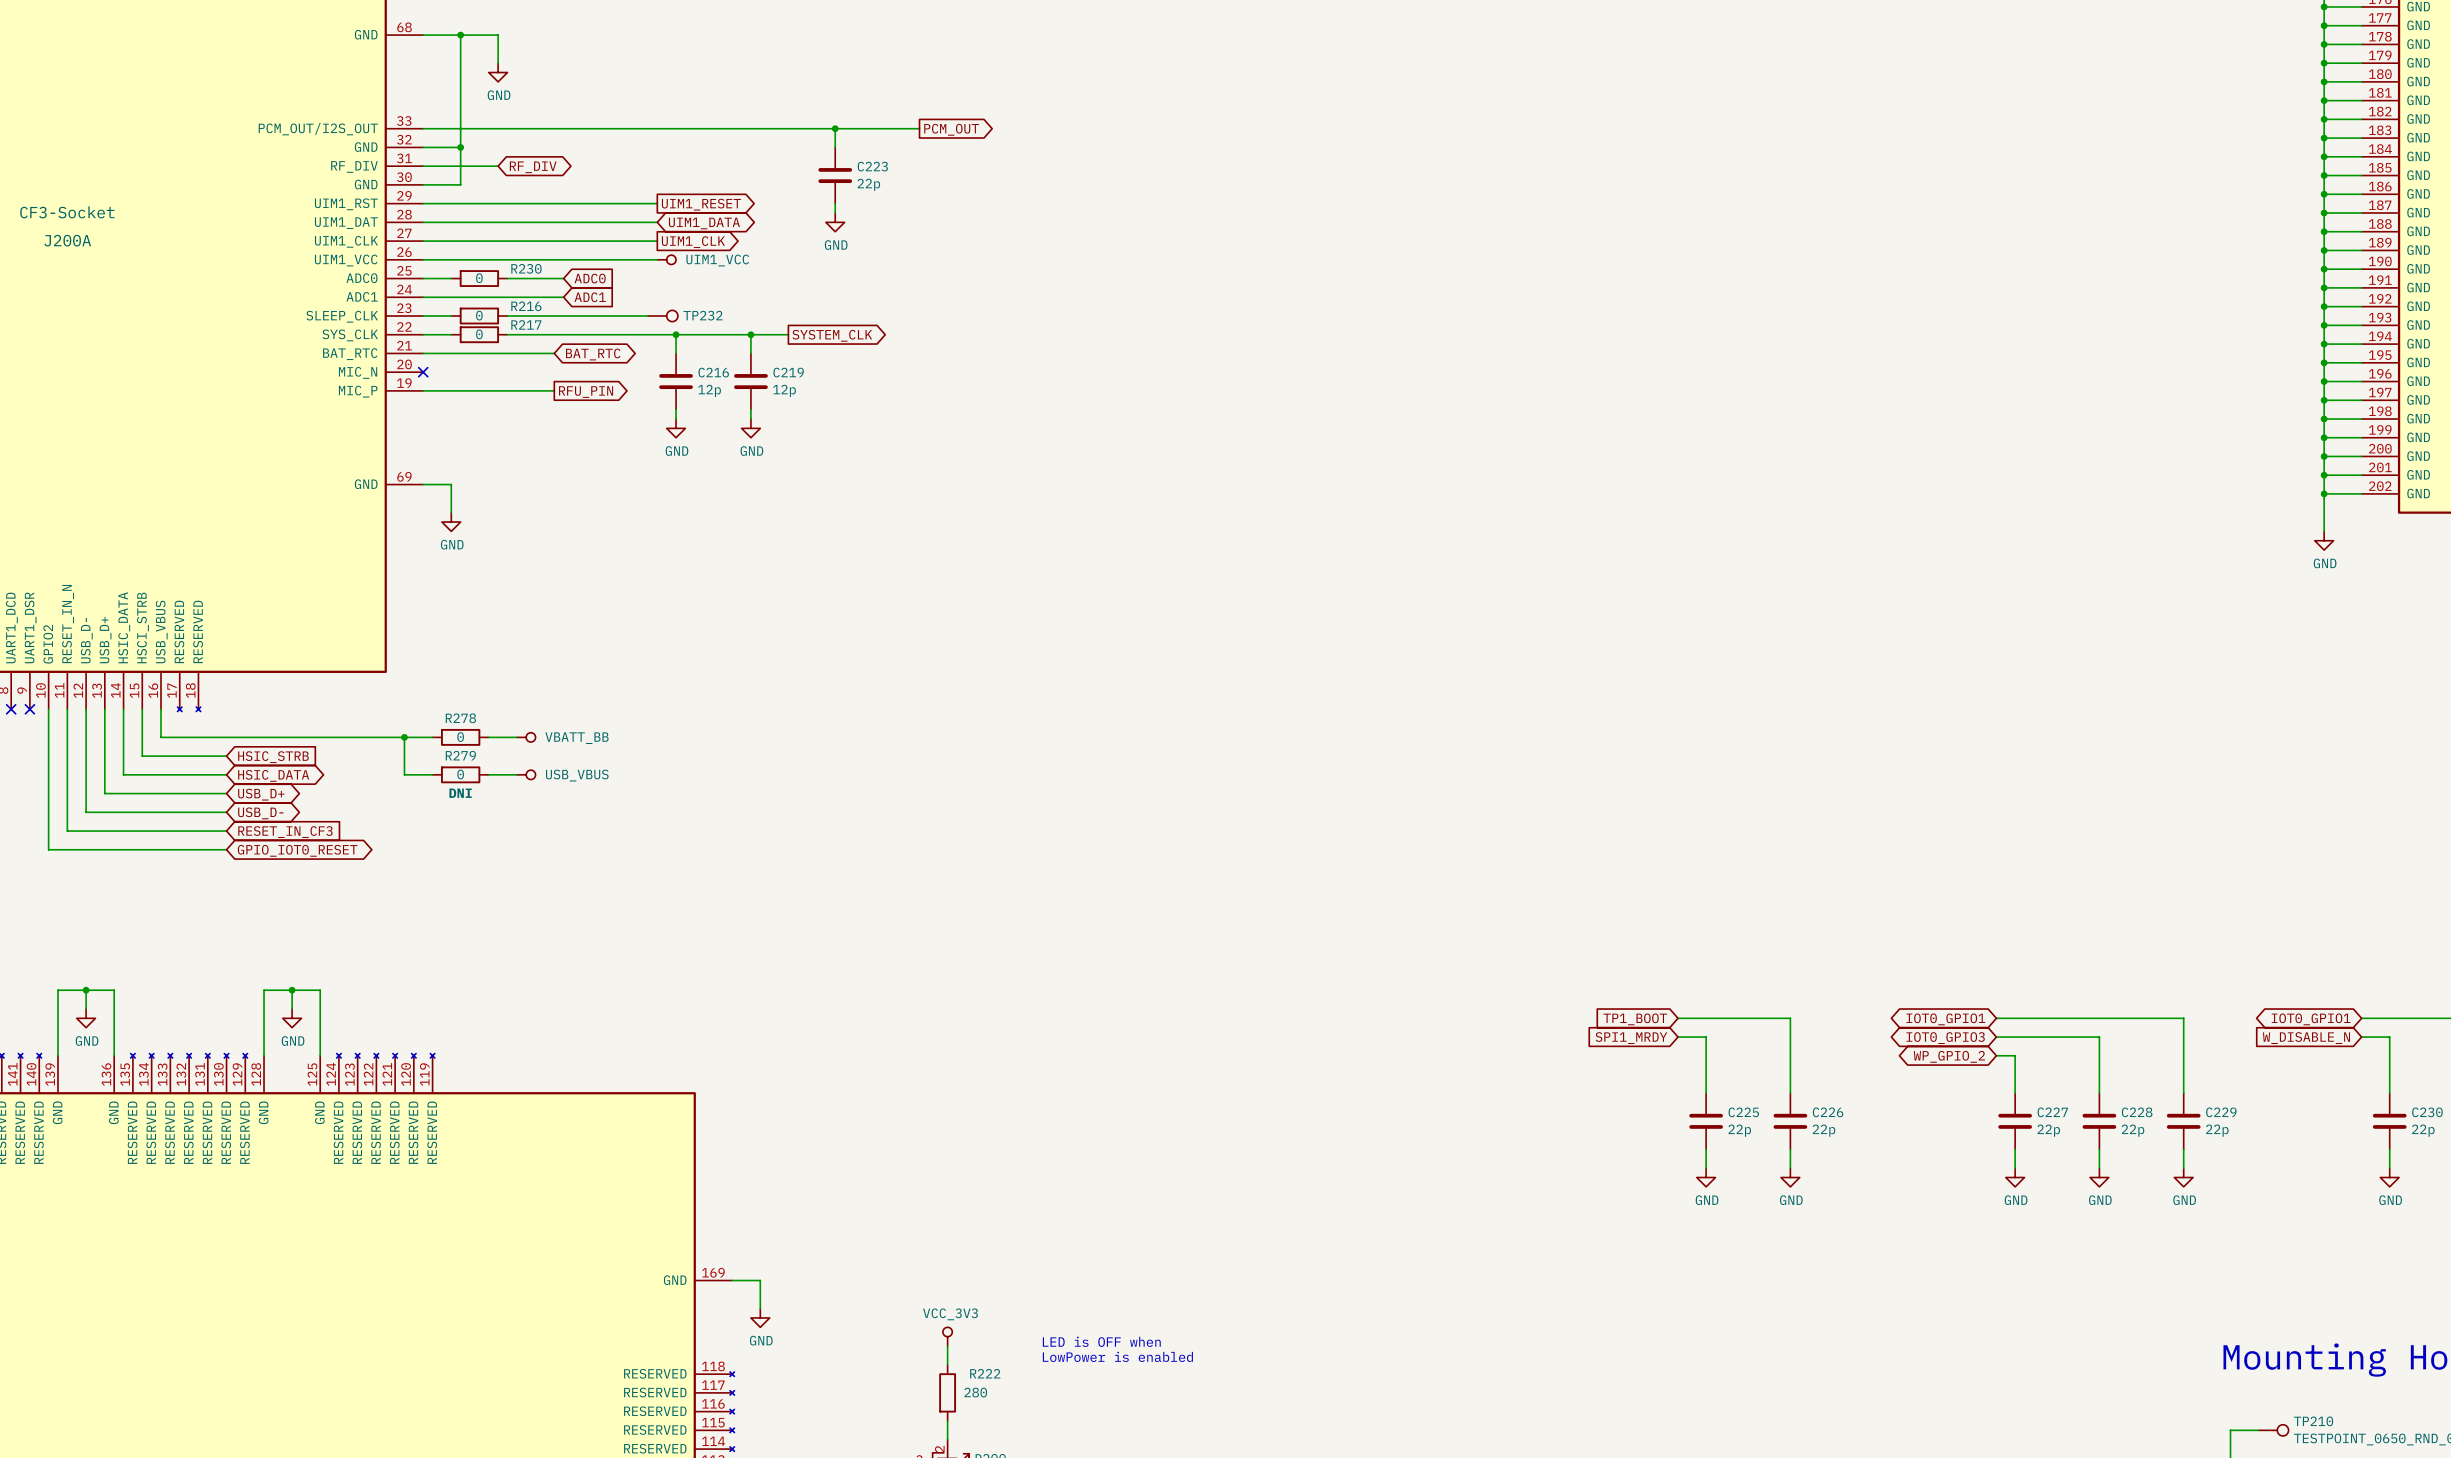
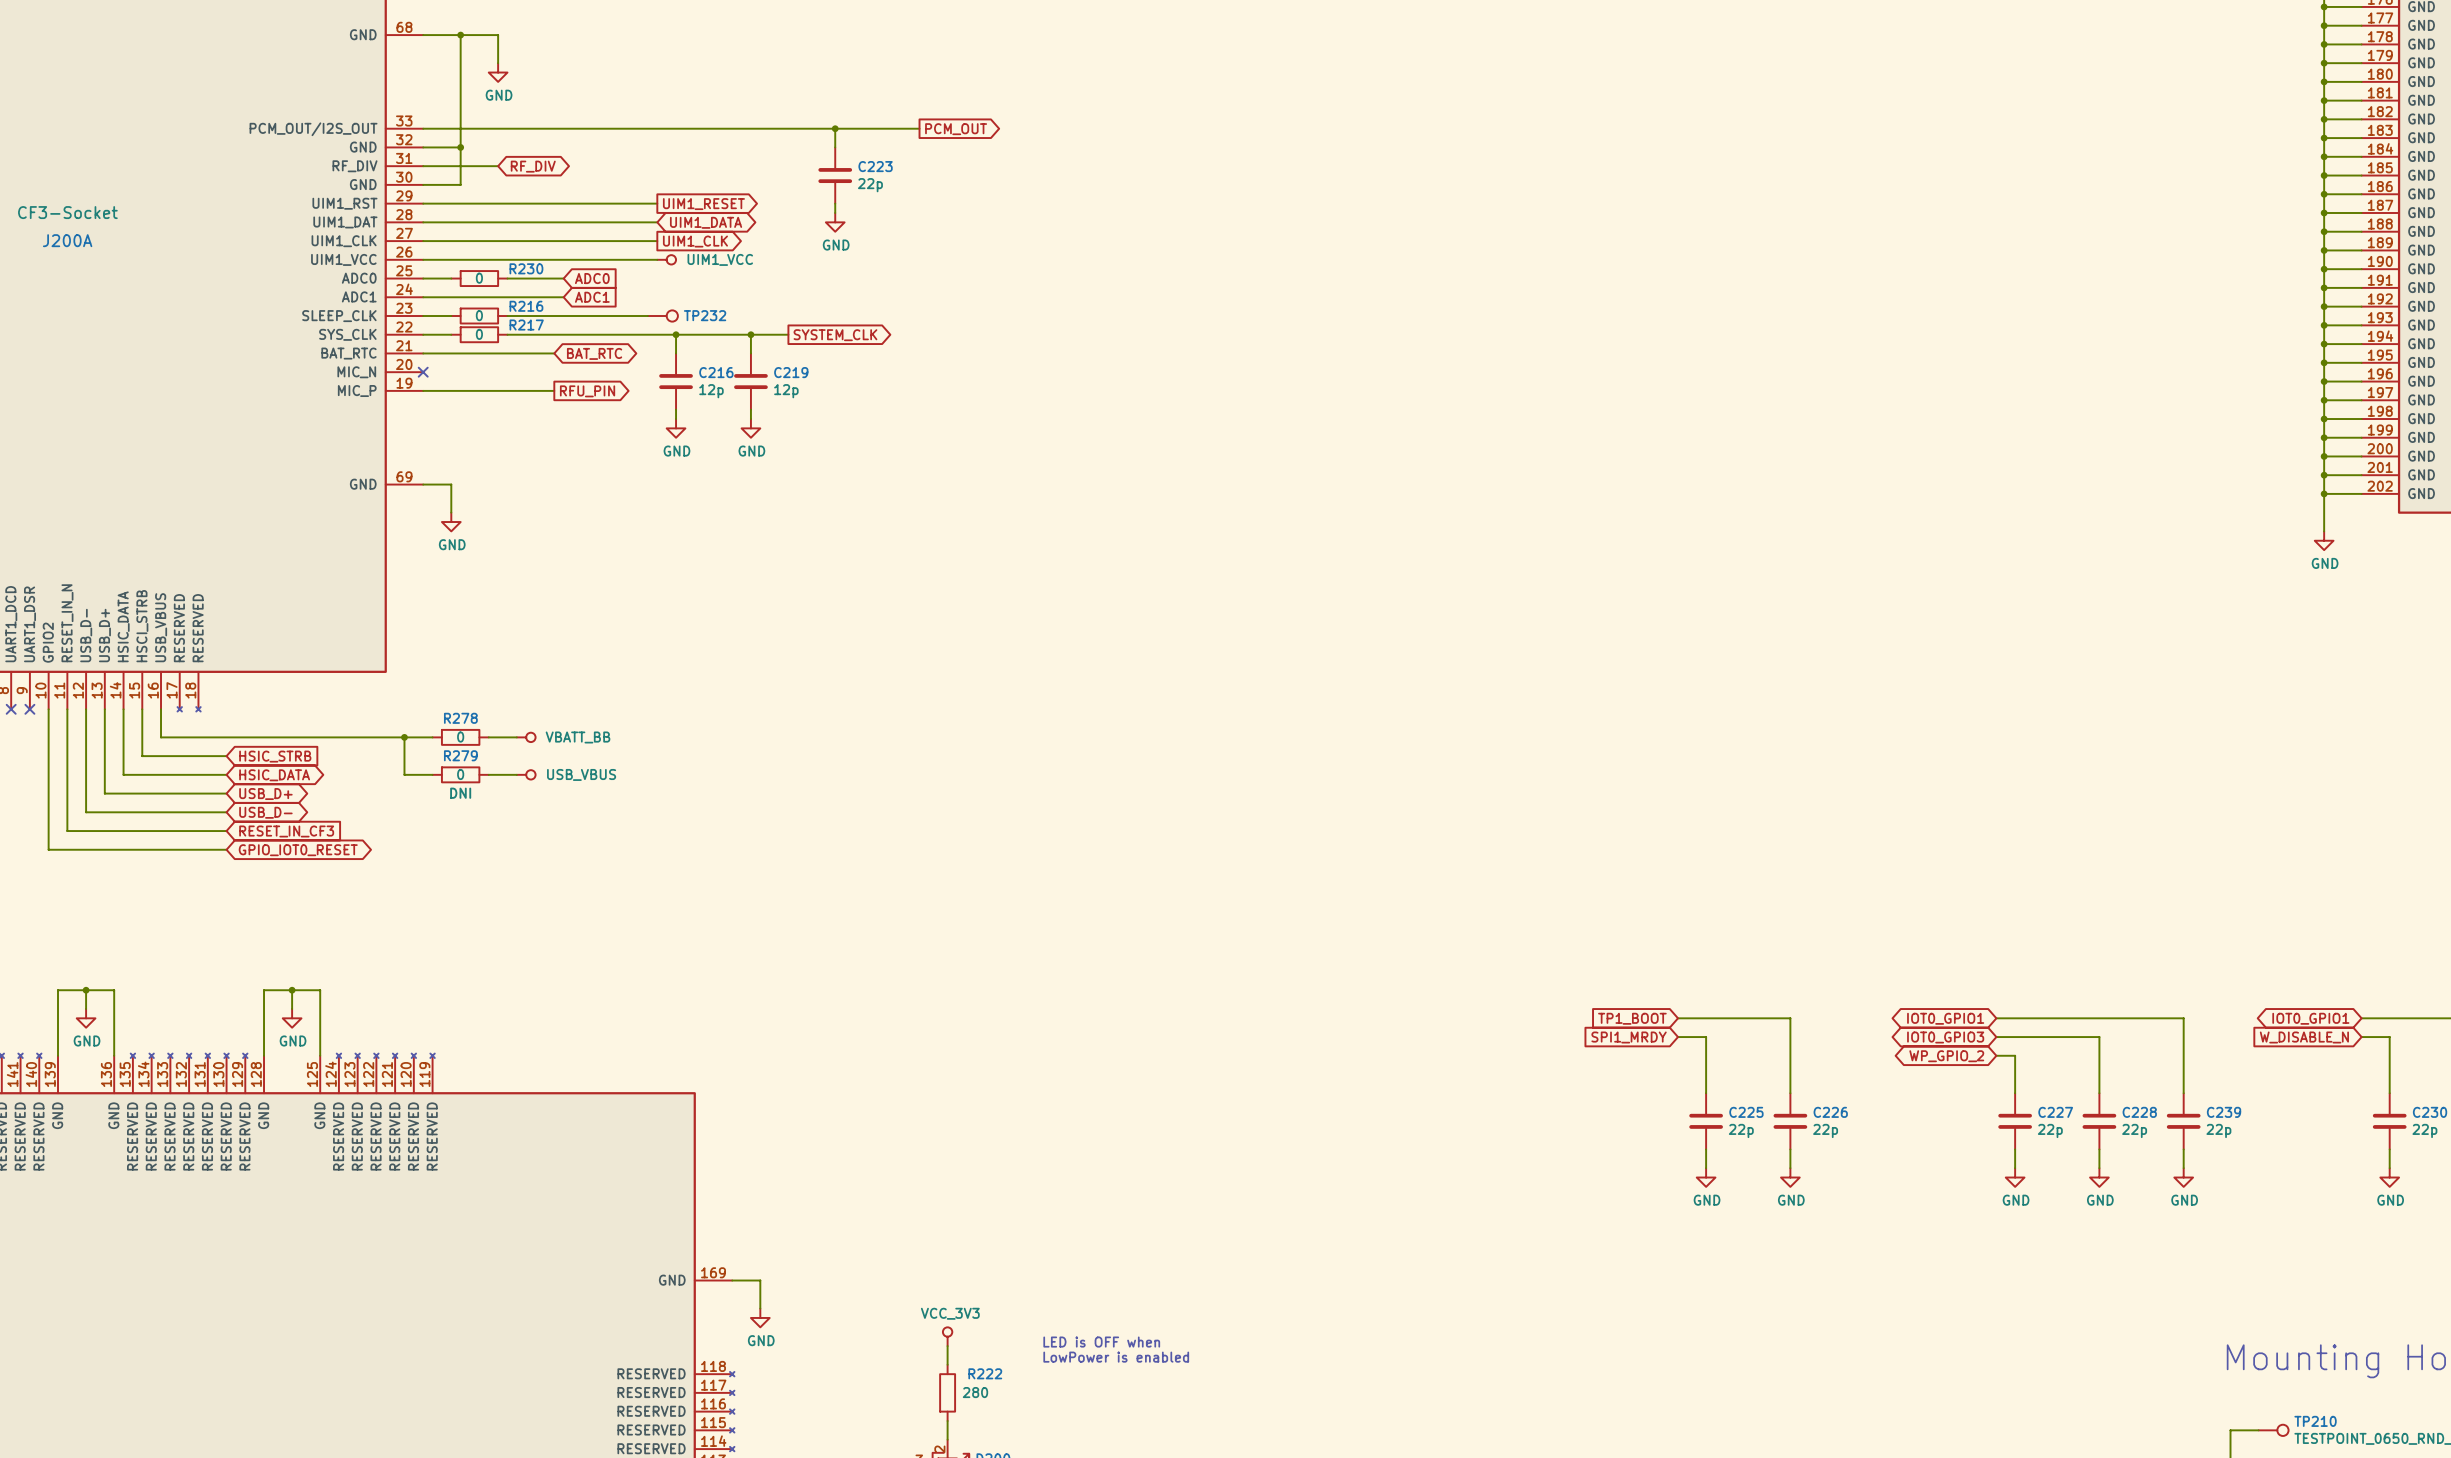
C229 name: C229 (2221, 1112) -> C239 (2224, 1112)

